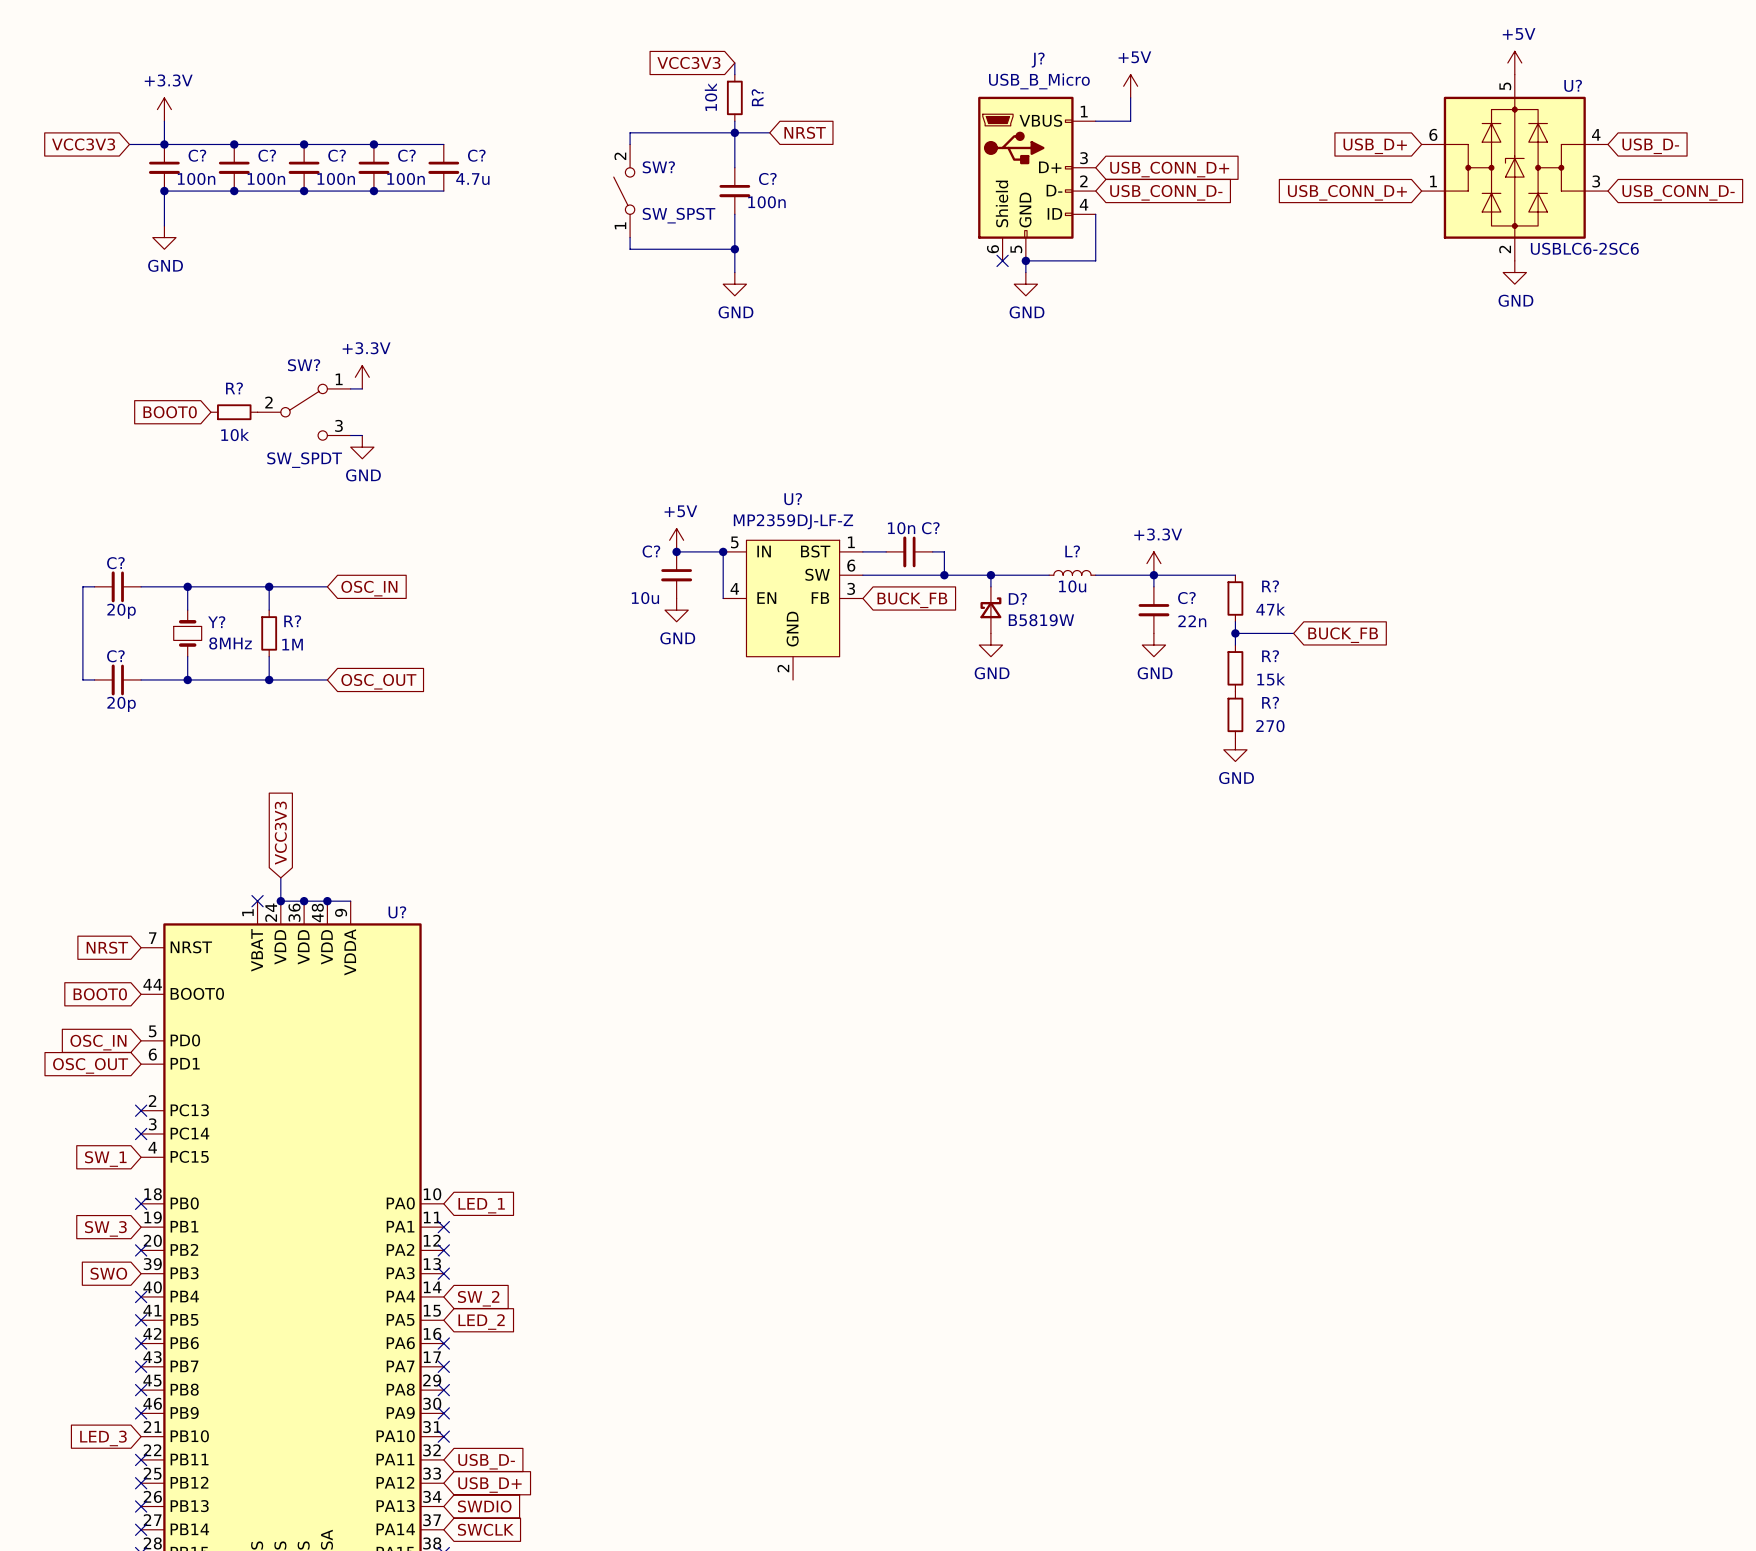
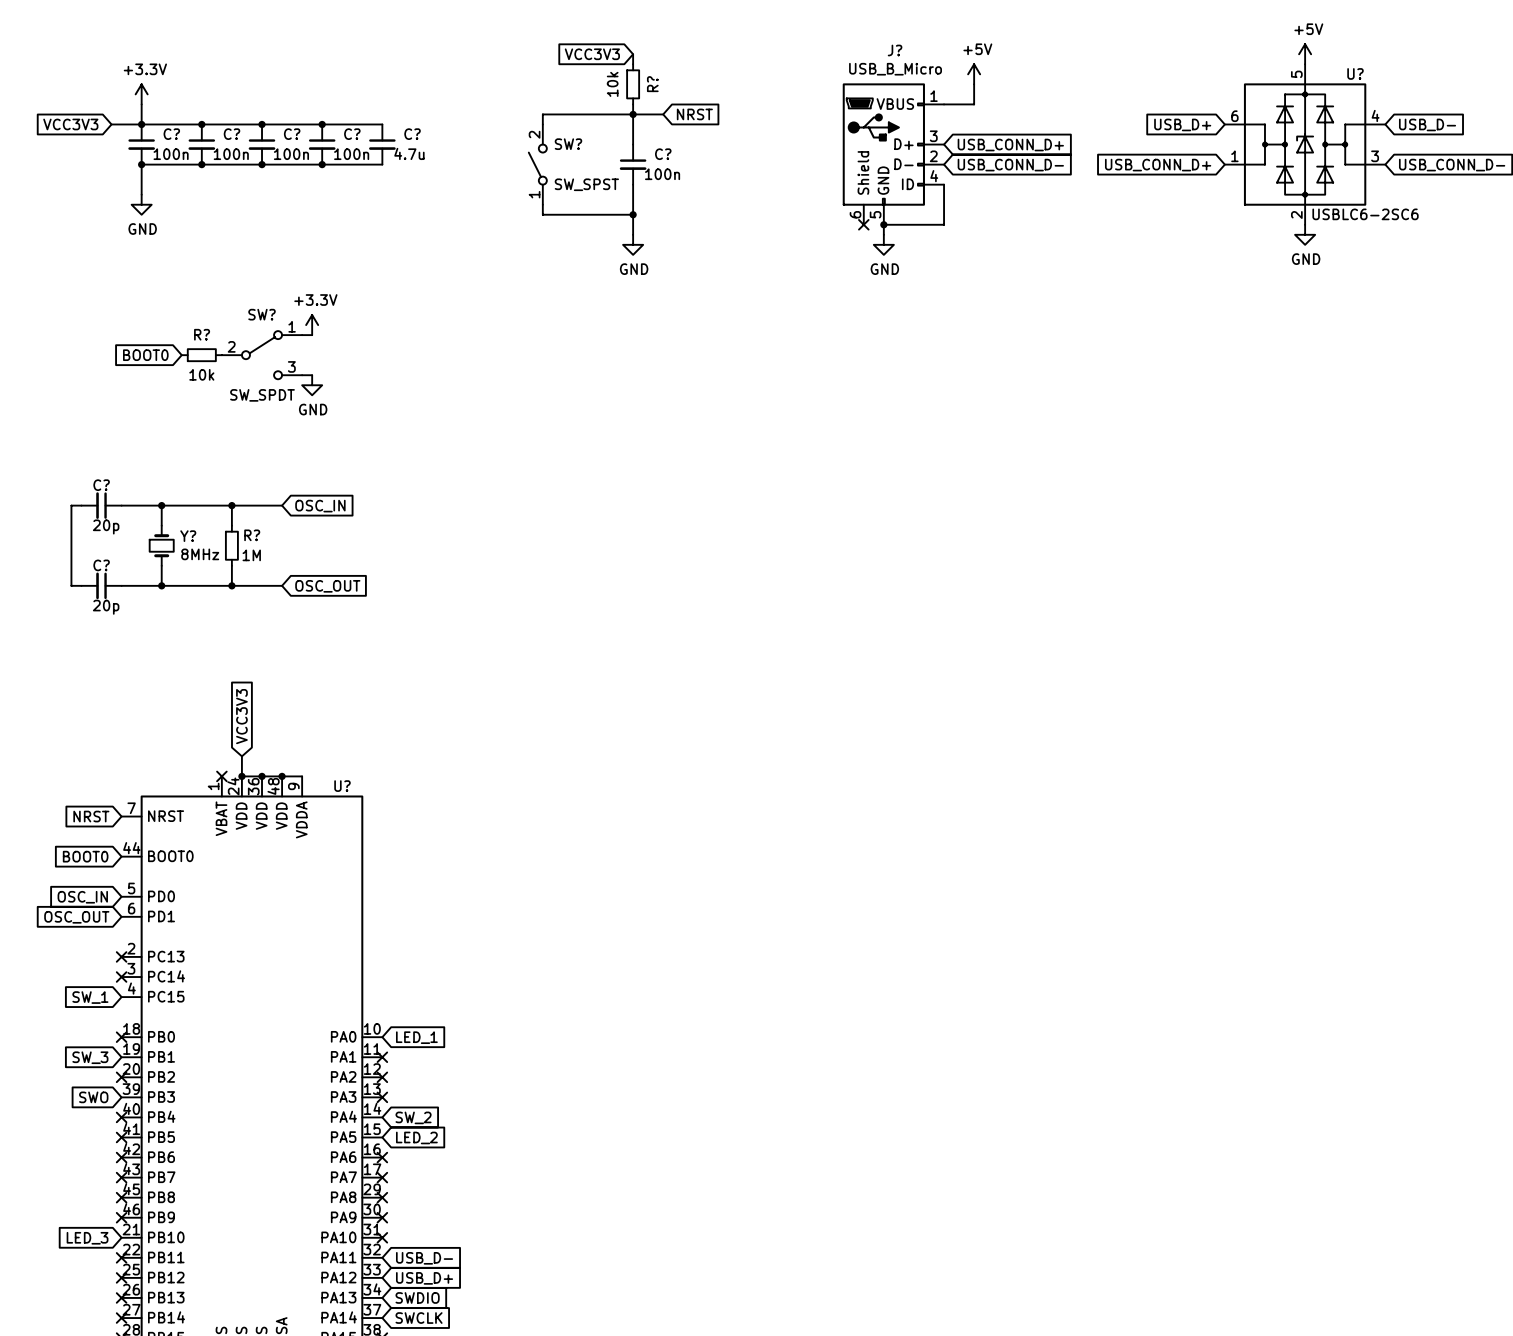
power symbol: +5V (676, 540) -> none
wire: (676, 551) (723, 551) (723, 598) -> none
junction: (676, 551) -> none
junction: (723, 551) -> none
wire: (862, 551) (886, 551) -> none
C?: 10n (909, 551) -> none
wire: (932, 551) (944, 551) (944, 575) -> none
power symbol: +3.3V (1153, 563) -> none
L?: 10u (1072, 572) -> none
C?: 10u (676, 575) -> none
wire: (862, 575) (1049, 575) -> none
junction: (944, 575) -> none
wire: (990, 575) (990, 586) -> none
junction: (990, 575) -> none
wire: (1095, 575) (1235, 575) -> none
wire: (1153, 575) (1153, 586) -> none
junction: (1153, 575) -> none
R?: 47k (1235, 598) -> none
global label: BUCK_FB (912, 600) -> none
power symbol: GND (676, 610) -> none
U?: MP2359DJ-LF-Z (793, 610) -> none
D?: B5819W (990, 610) -> none
C?: 22n (1153, 610) -> none
wire: (1235, 621) (1235, 645) -> none
wire: (1235, 633) (1293, 633) -> none
junction: (1235, 633) -> none
global label: BUCK_FB (1343, 635) -> none
power symbol: GND (990, 645) -> none
power symbol: GND (1153, 645) -> none
R?: 15k (1235, 668) -> none
R?: 270 (1235, 714) -> none
power symbol: GND (1235, 749) -> none

